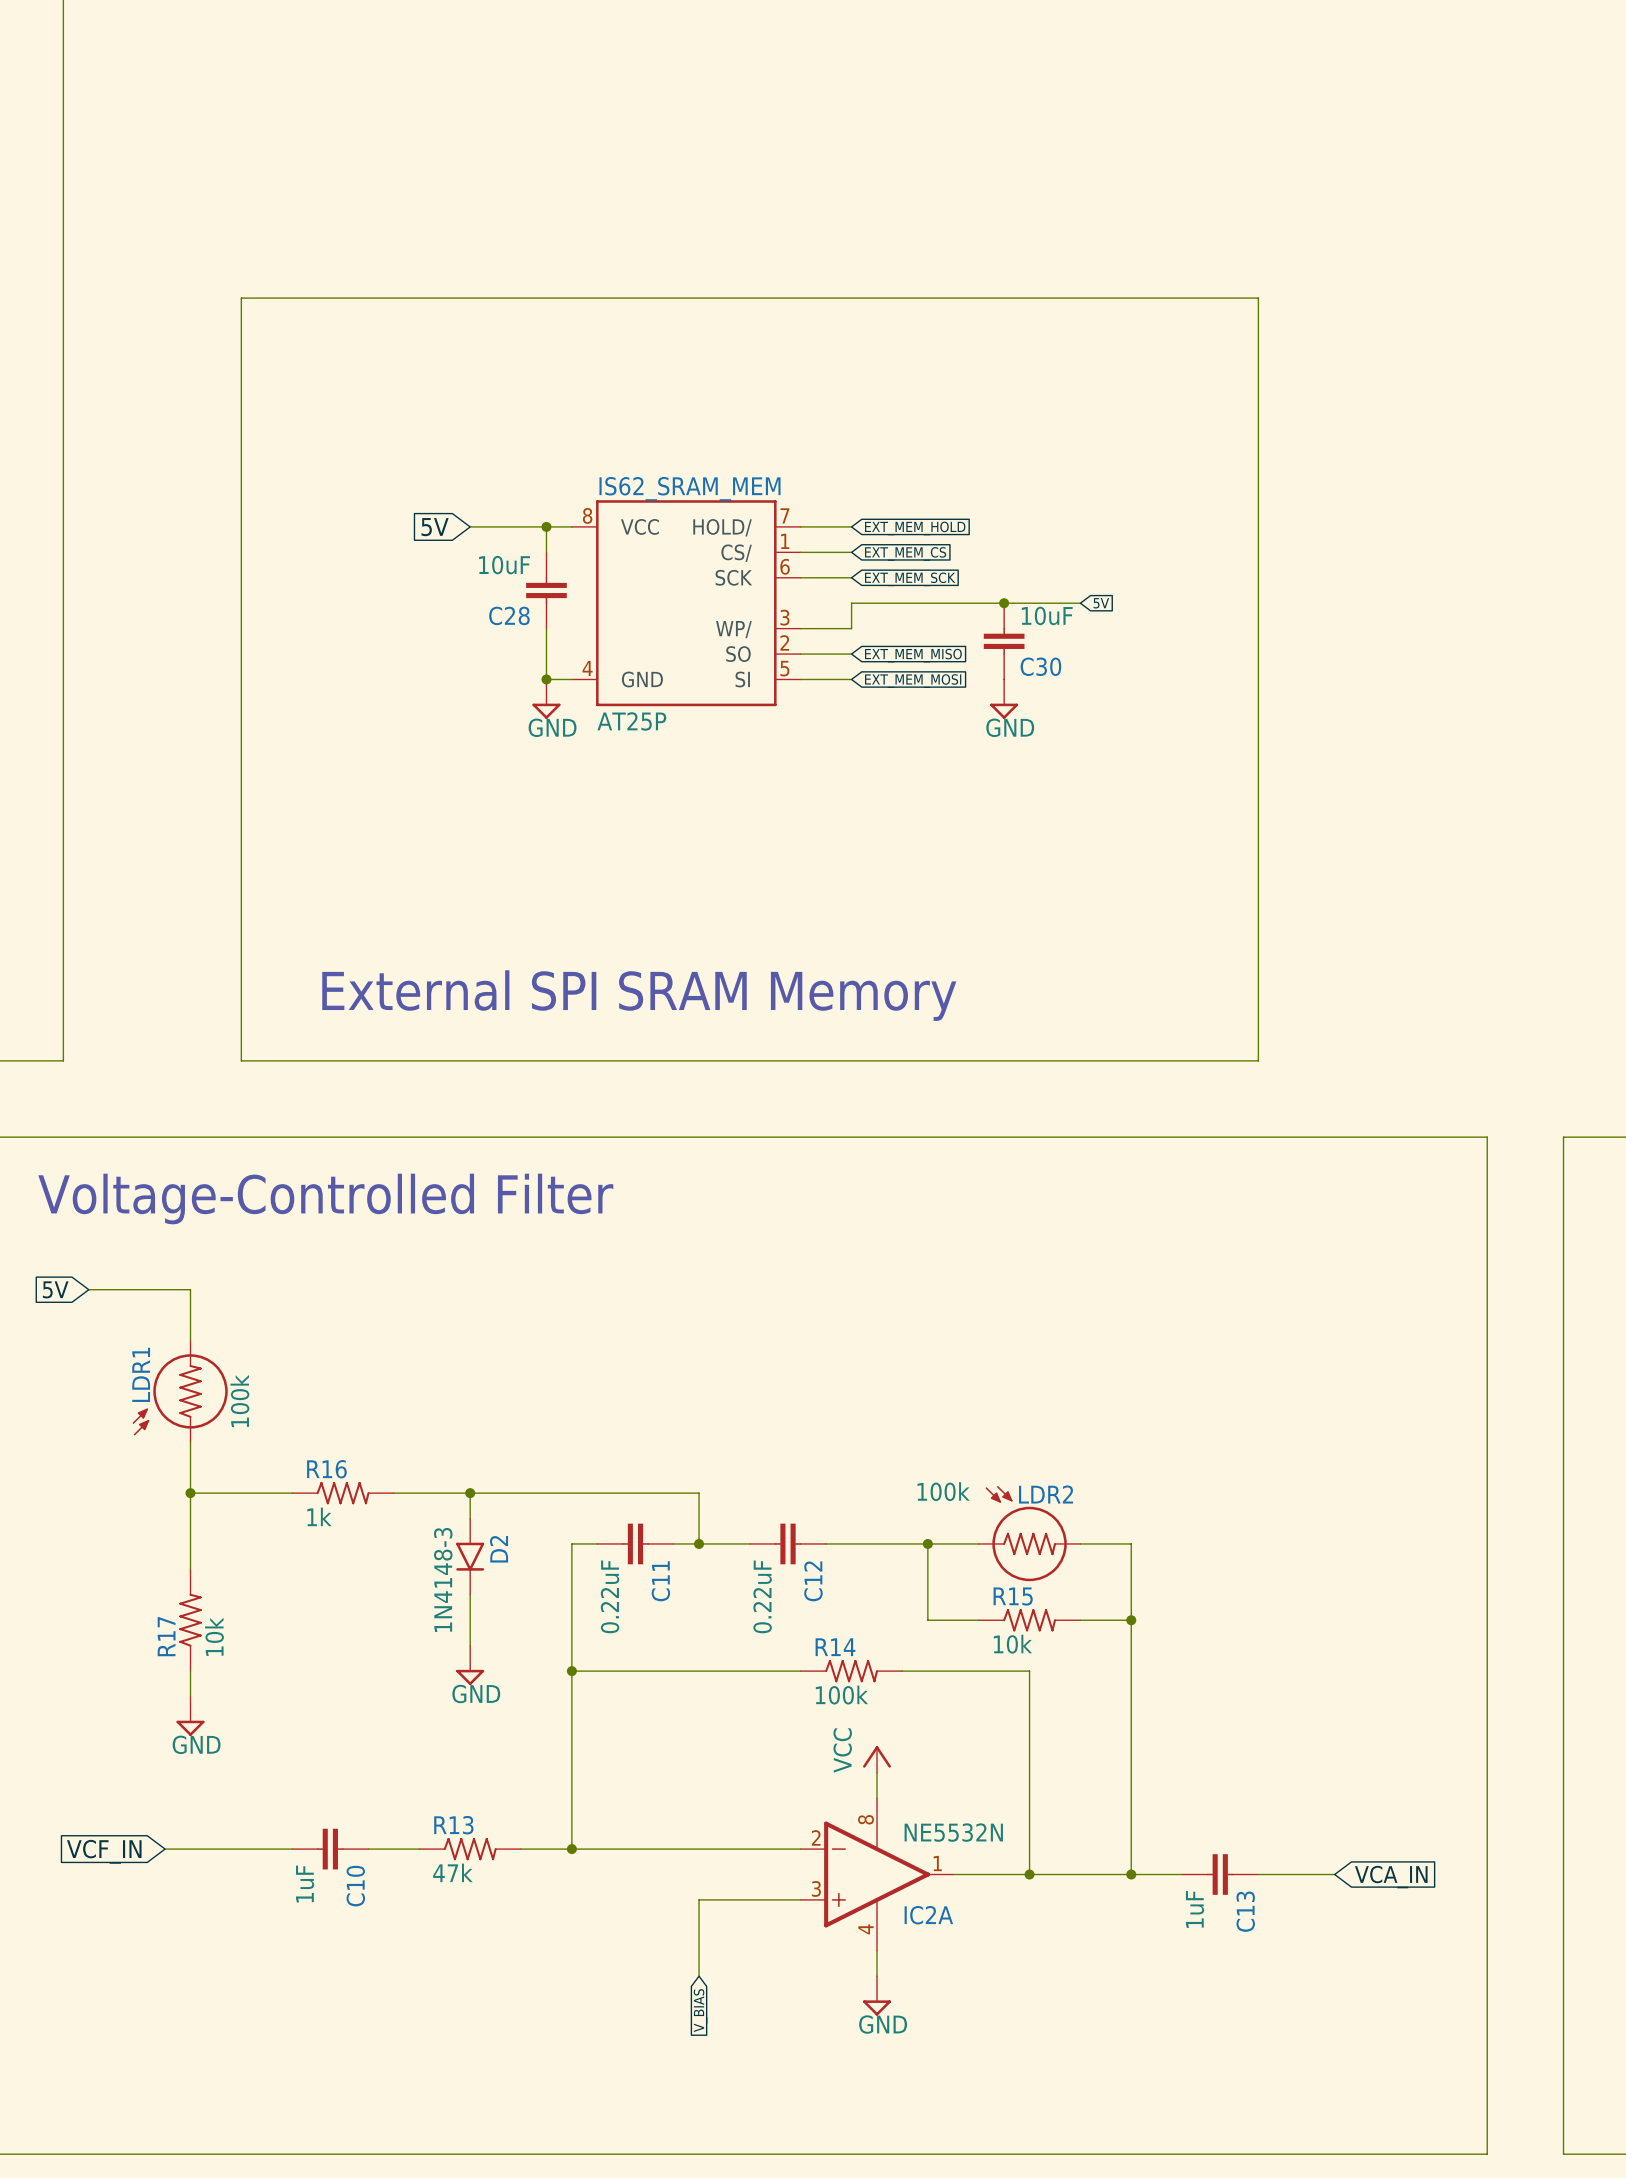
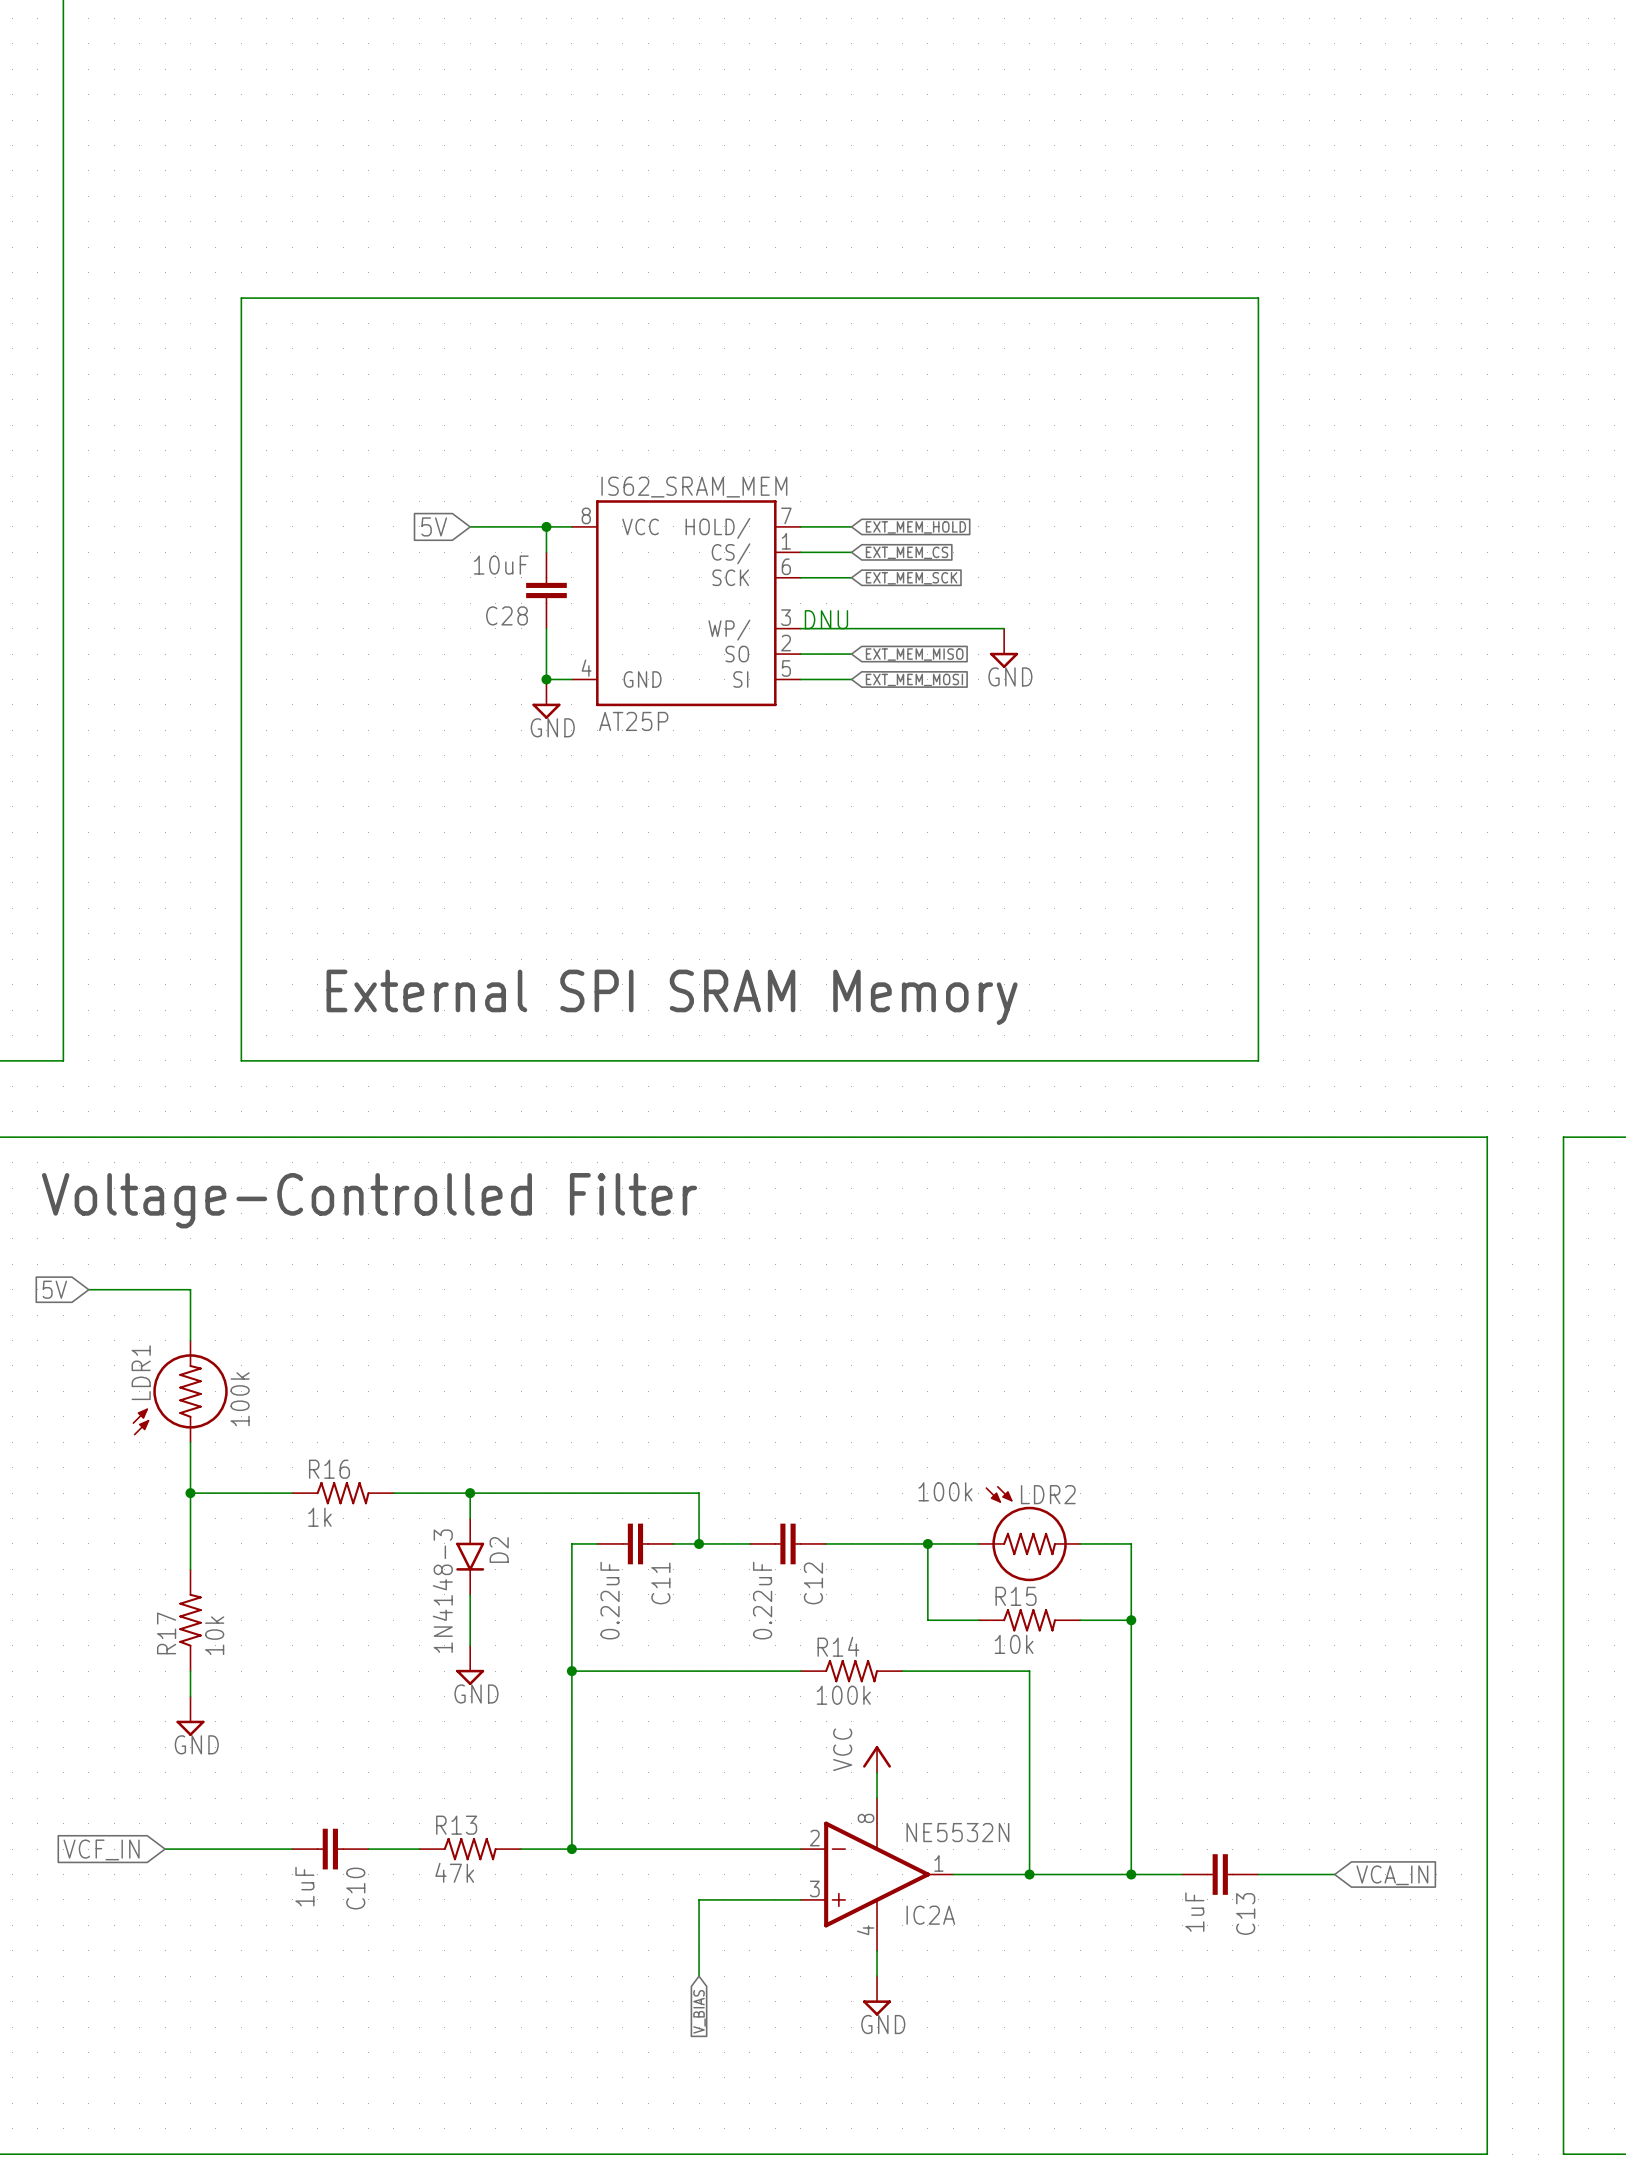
junction: (1004, 603) -> none
wire: (1080, 603) (851, 603) (851, 628) -> (1004, 628) (851, 628)
global label: 5V (1101, 603) -> none
text: none -> DNU (826, 619)
C30: 10uF (1004, 641) -> none
power symbol position: GND (1004, 699) -> GND (1004, 648)

